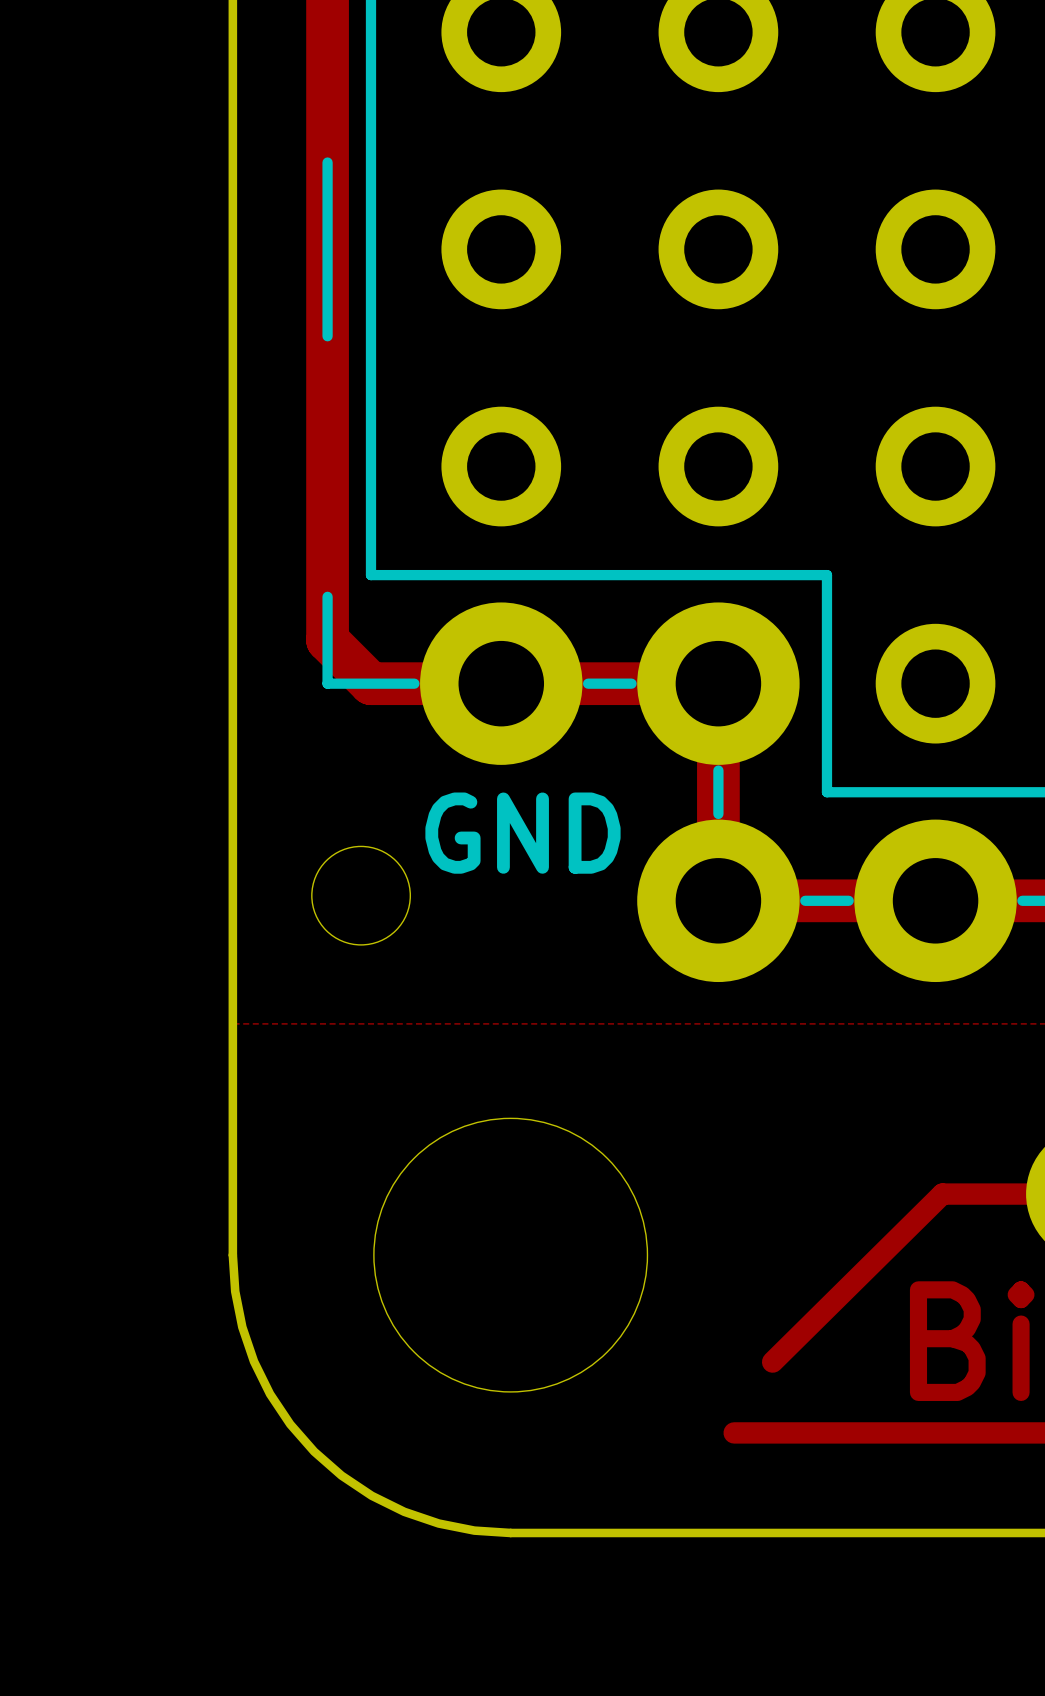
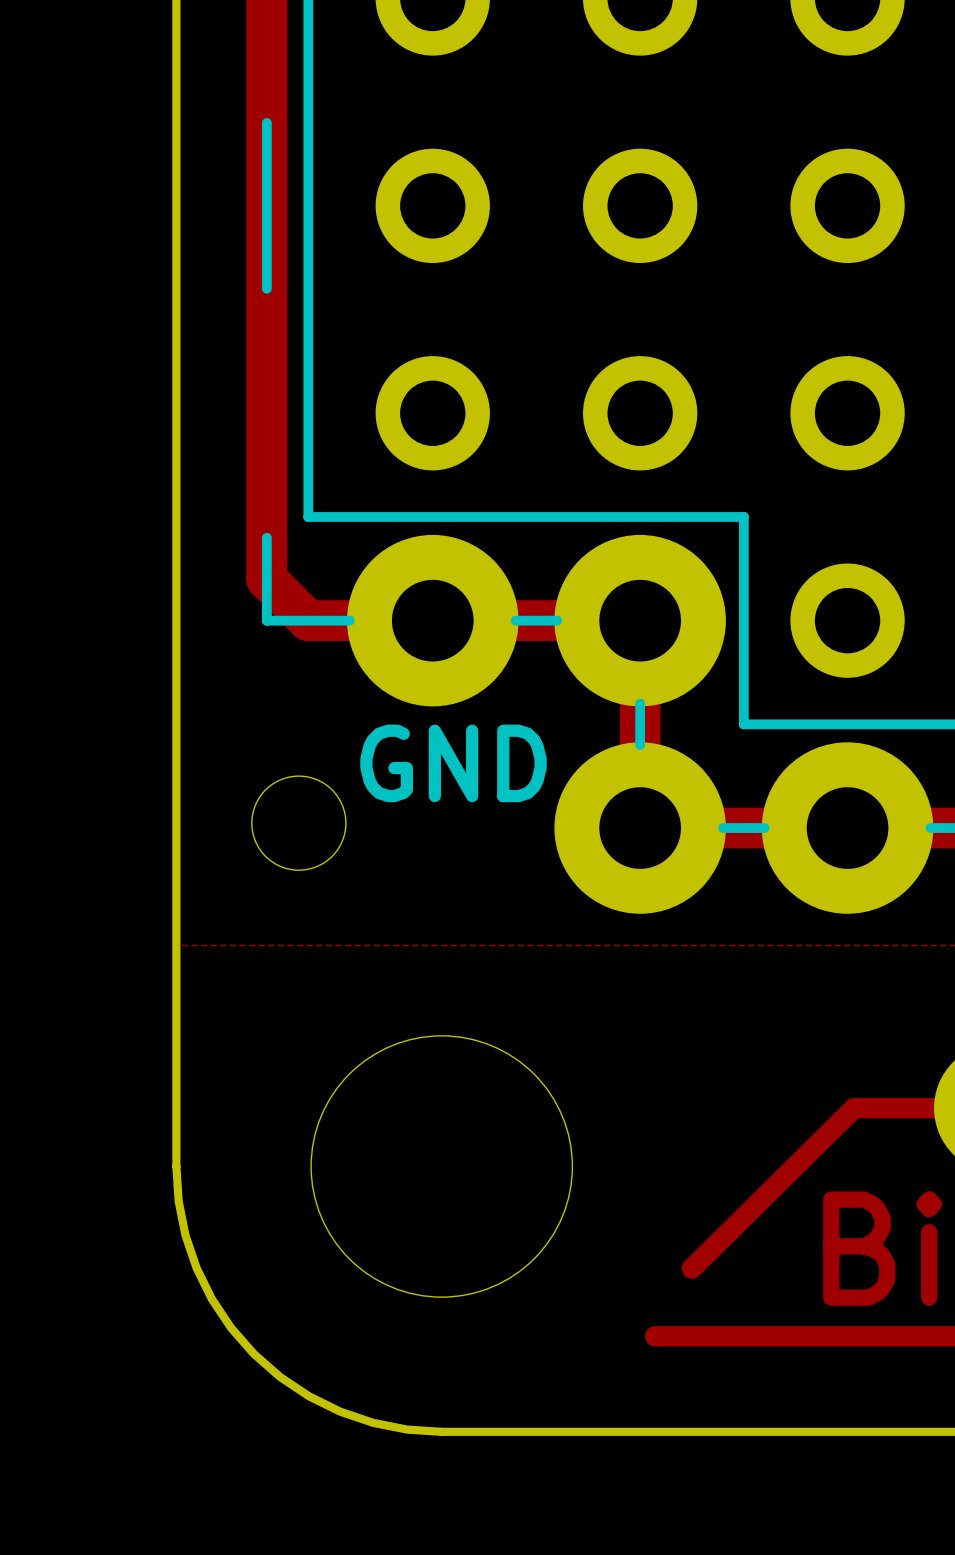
part footprint: [420, 602, 583, 765] -> [347, 534, 519, 707]
part footprint: [637, 602, 800, 765] -> [554, 534, 726, 707]
part footprint: [637, 819, 800, 983] -> [554, 742, 726, 914]
part footprint: [854, 819, 1017, 983] -> [761, 742, 934, 914]

